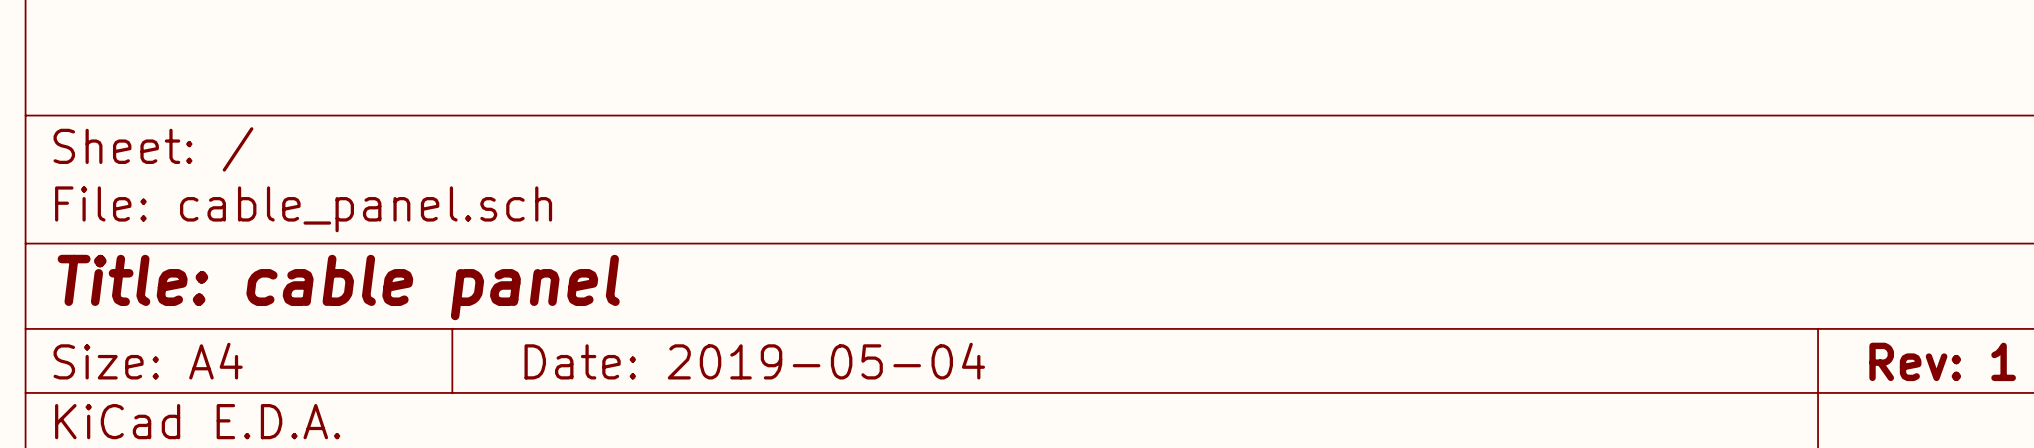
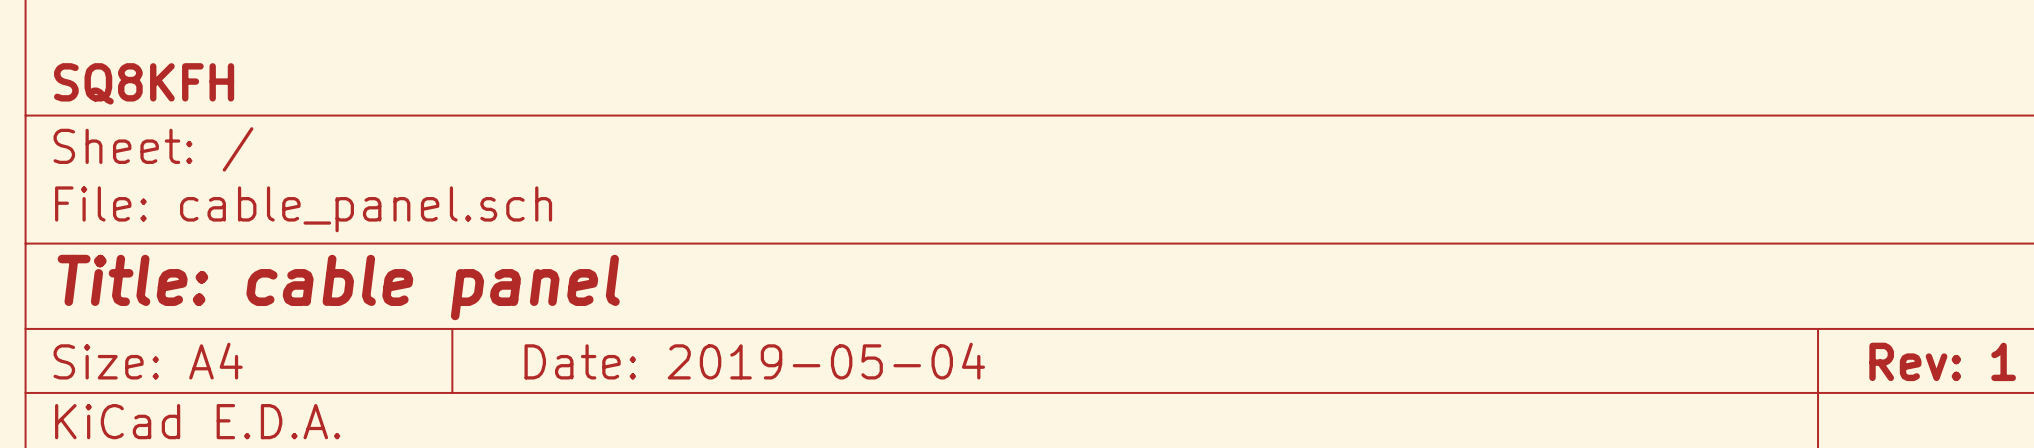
title block: none -> SQ8KFH (144, 83)

